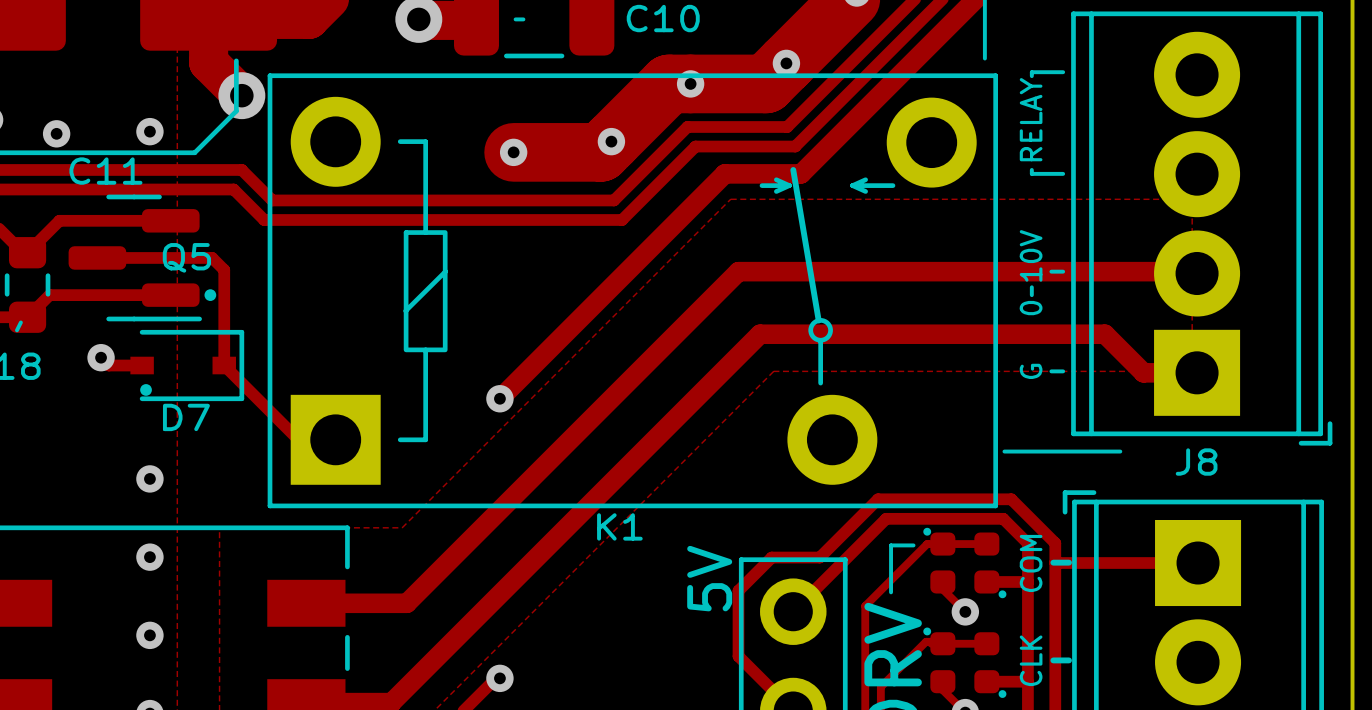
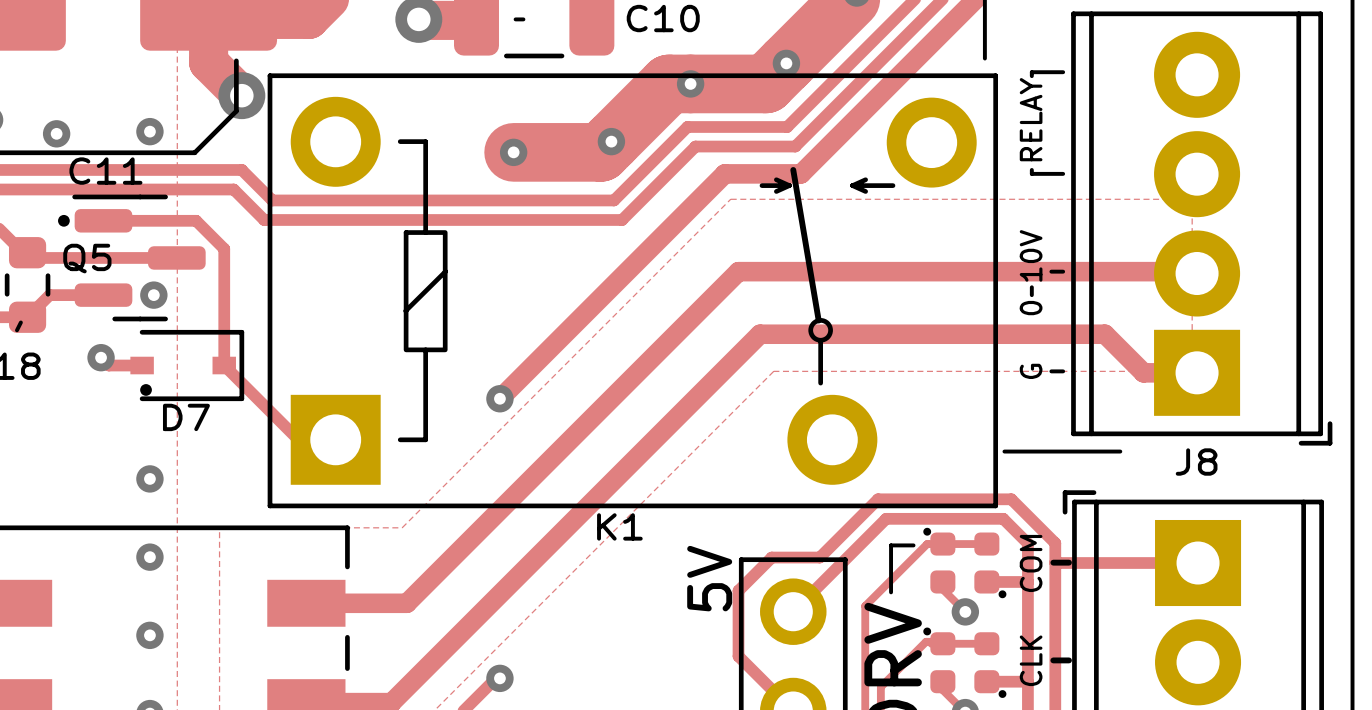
track: (103, 220) (59, 220) (27, 252) -> none
track: none -> (23, 252) (27, 252) (32, 257) (97, 257)
Q5 rotation: 0° (142, 257) -> 180° (131, 257)
track: (176, 257) (212, 257) (224, 270) -> (170, 220) (196, 220) (224, 248) (224, 270)
track: (103, 295) (170, 295) -> none
via: none -> (153, 295)

